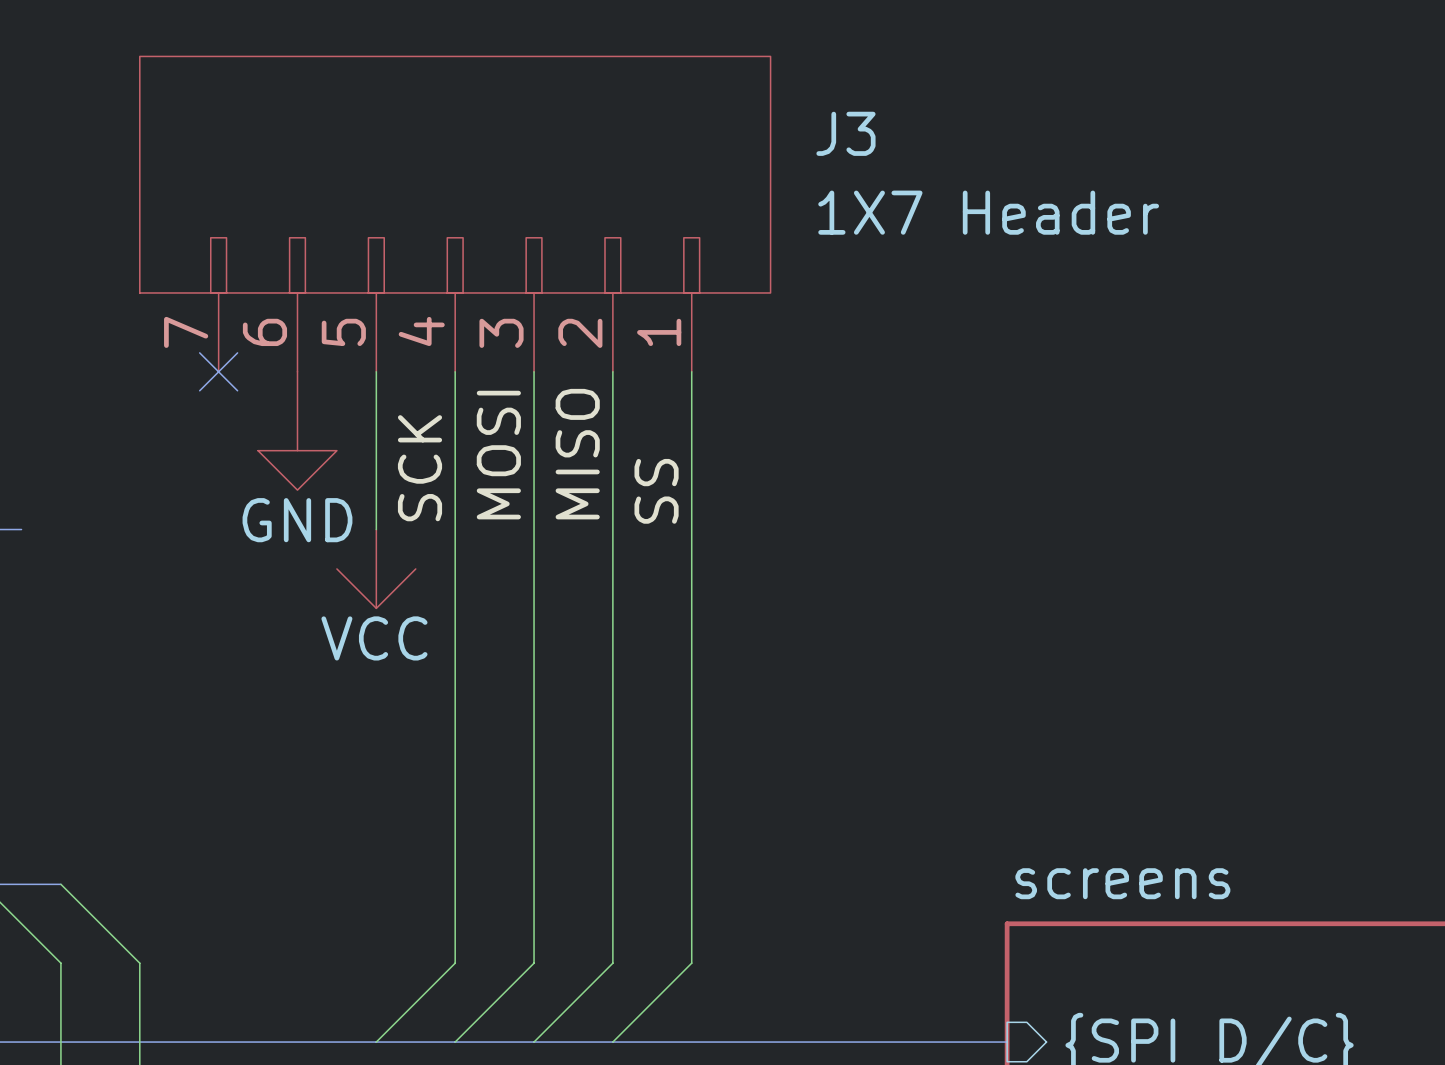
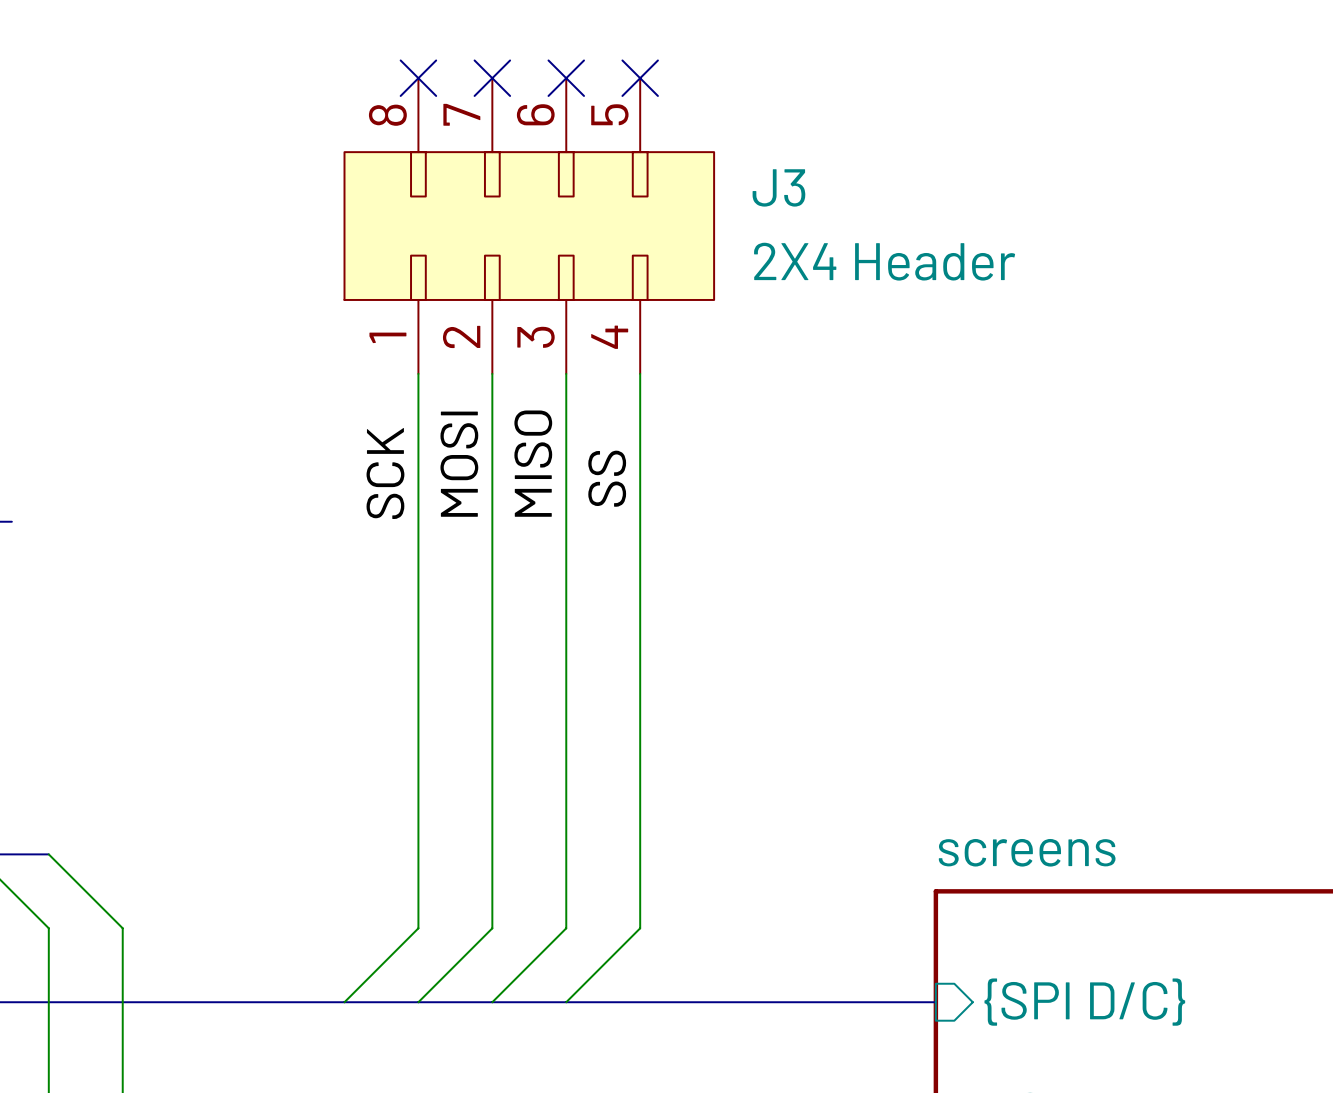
J3 symbol: [139, 56, 771, 372] -> [344, 78, 715, 374]
no-connect mark: none -> (418, 78)
no-connect mark: none -> (492, 78)
no-connect mark: none -> (566, 78)
no-connect mark: none -> (640, 78)
J3 name position: J3 (845, 133) -> J3 (778, 187)
J3 value: 1X7 Header (988, 212) -> 2X4 Header (884, 261)
no-connect mark: (218, 371) -> none
wire: (376, 371) (376, 529) -> none
power symbol: GND (297, 430) -> none
power symbol: VCC (376, 568) -> none

